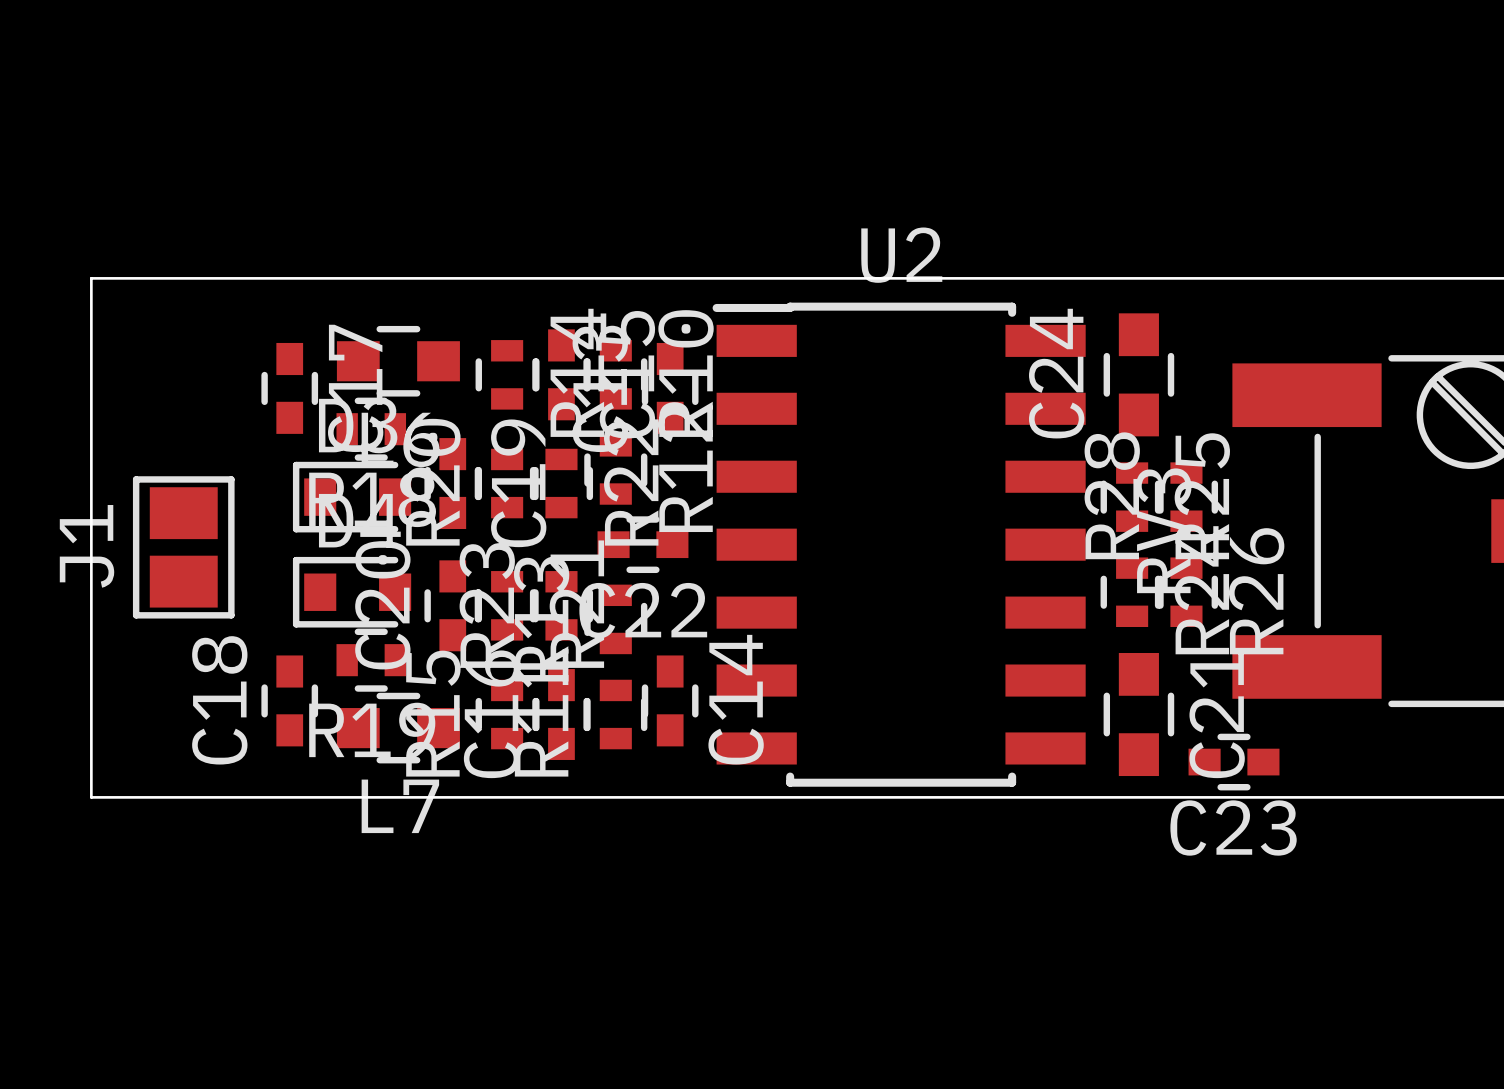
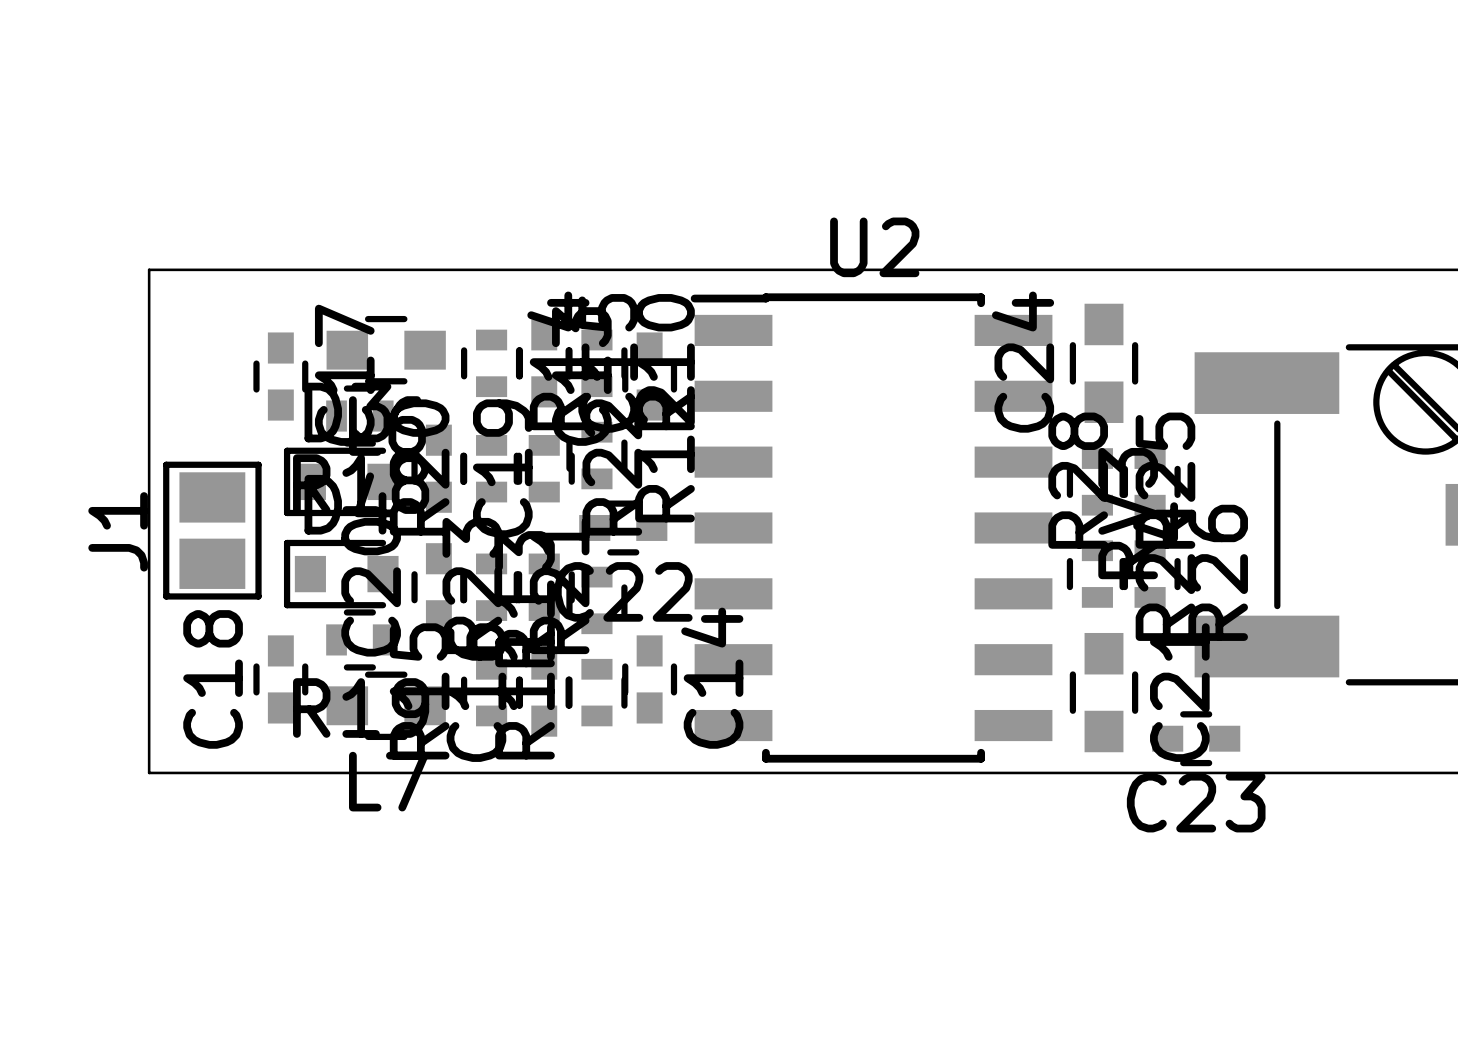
board edge: (153, 278) (91, 278) (91, 797) (153, 797) -> (149, 269) (149, 772)
J1 position: (183, 547) -> (212, 530)

